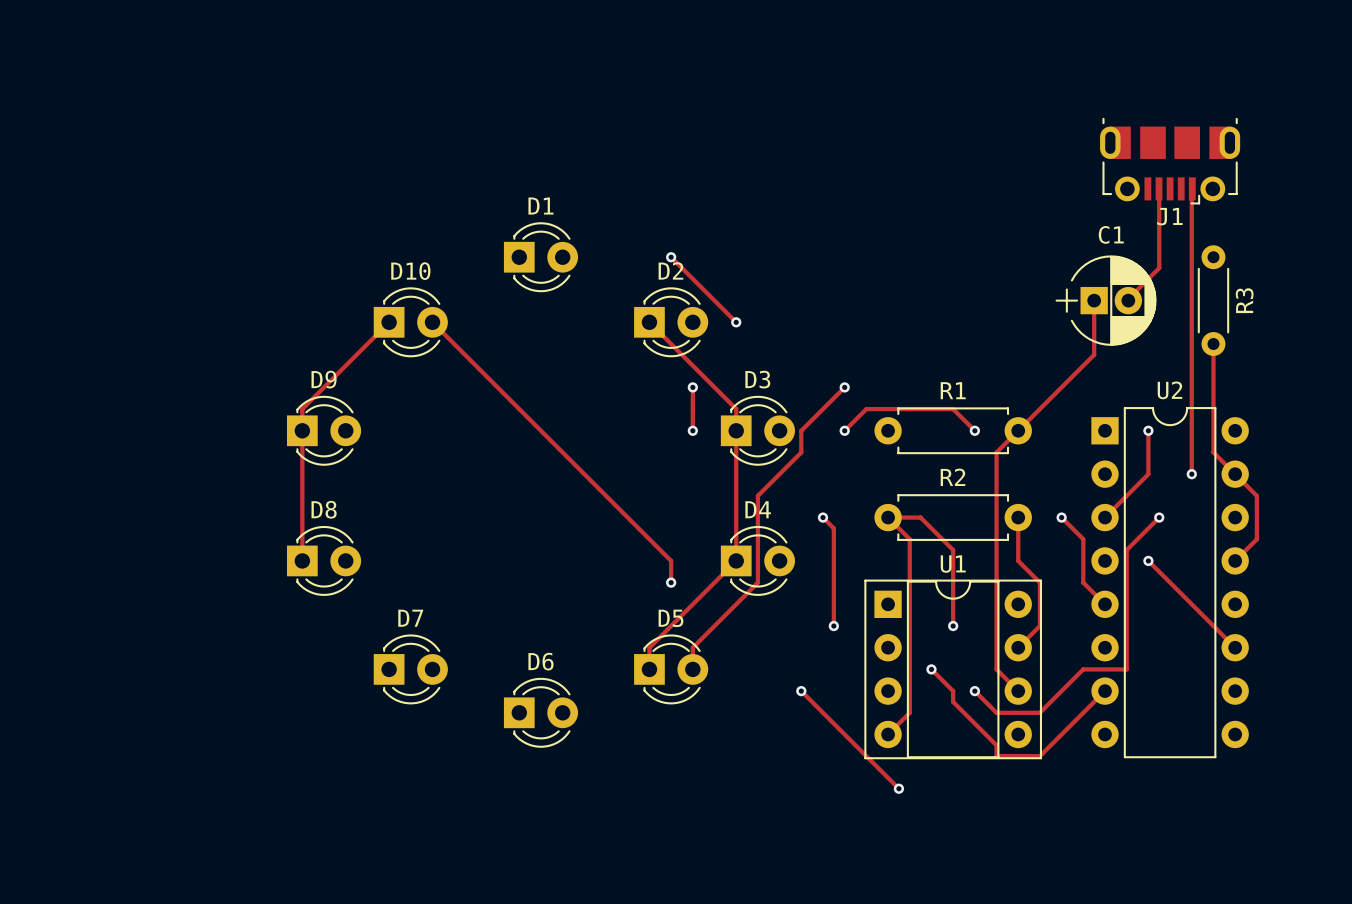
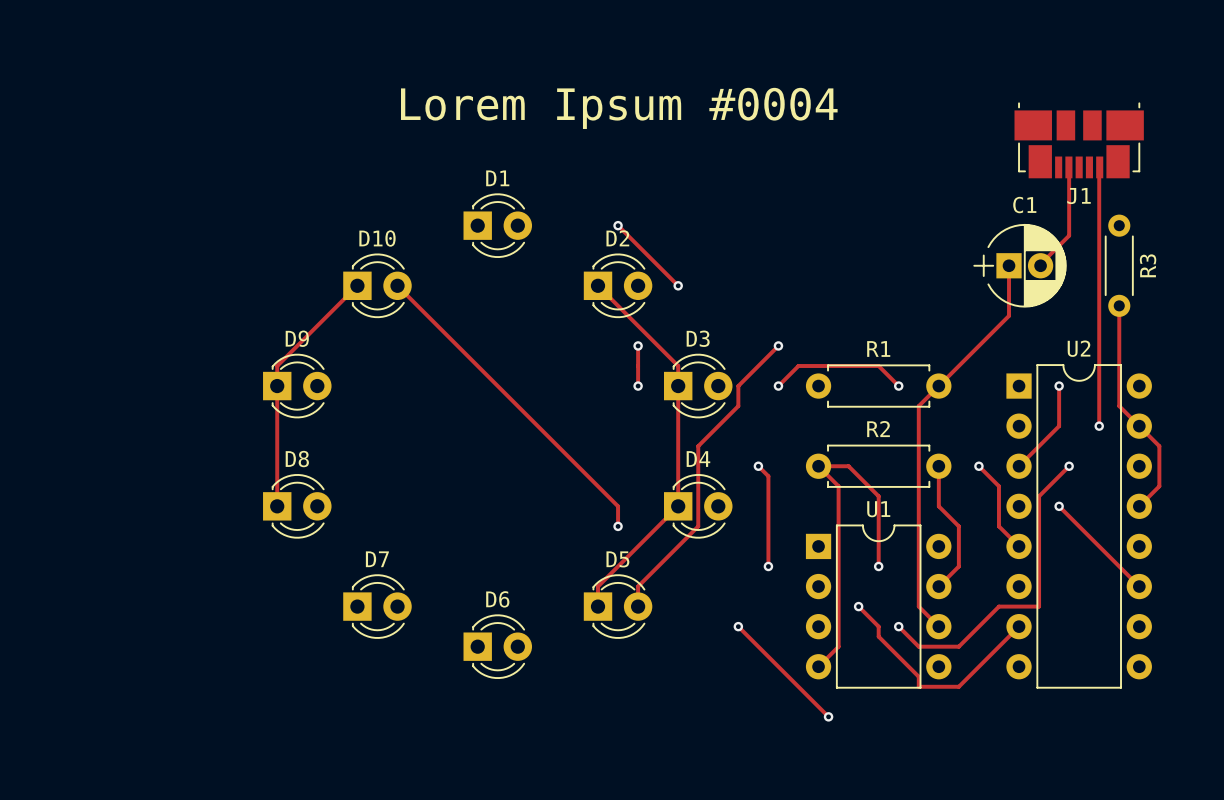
J1 footprint: [1100, 117, 1241, 205] -> [1014, 102, 1144, 179]
text: none -> Lorem Ipsum #0004 (619, 108)
U1 footprint: [864, 579, 1042, 760] -> [805, 524, 952, 689]

